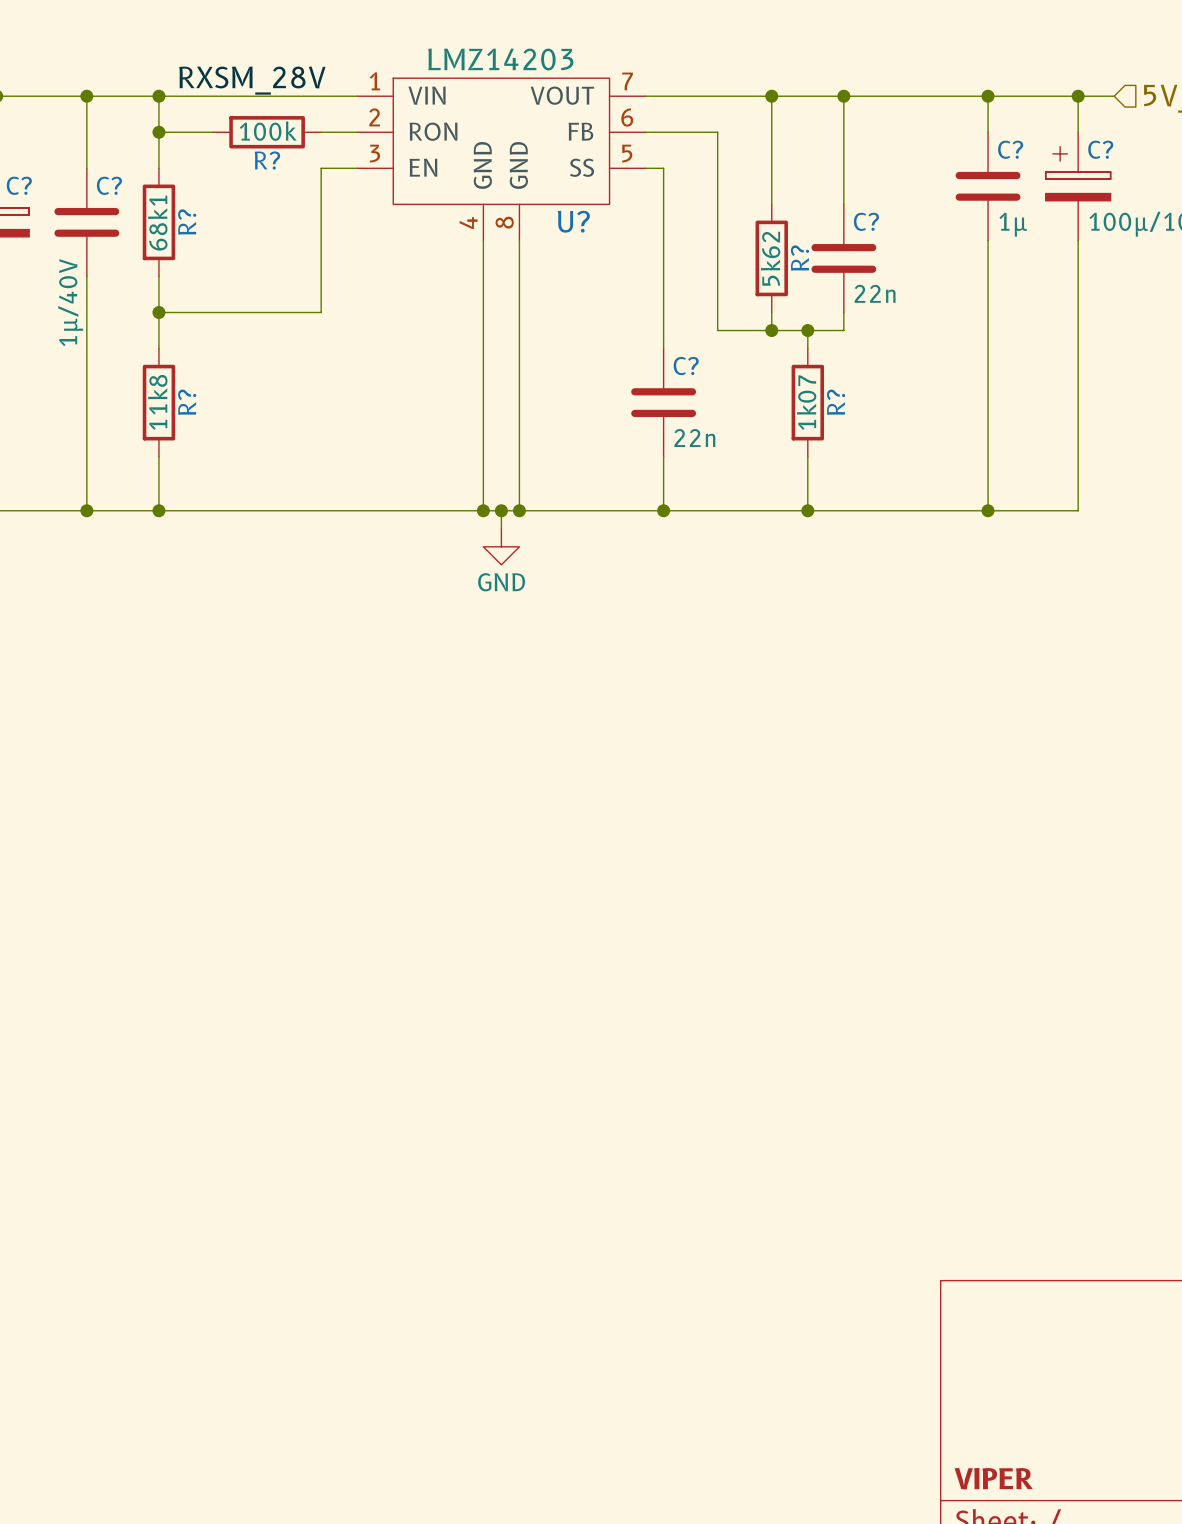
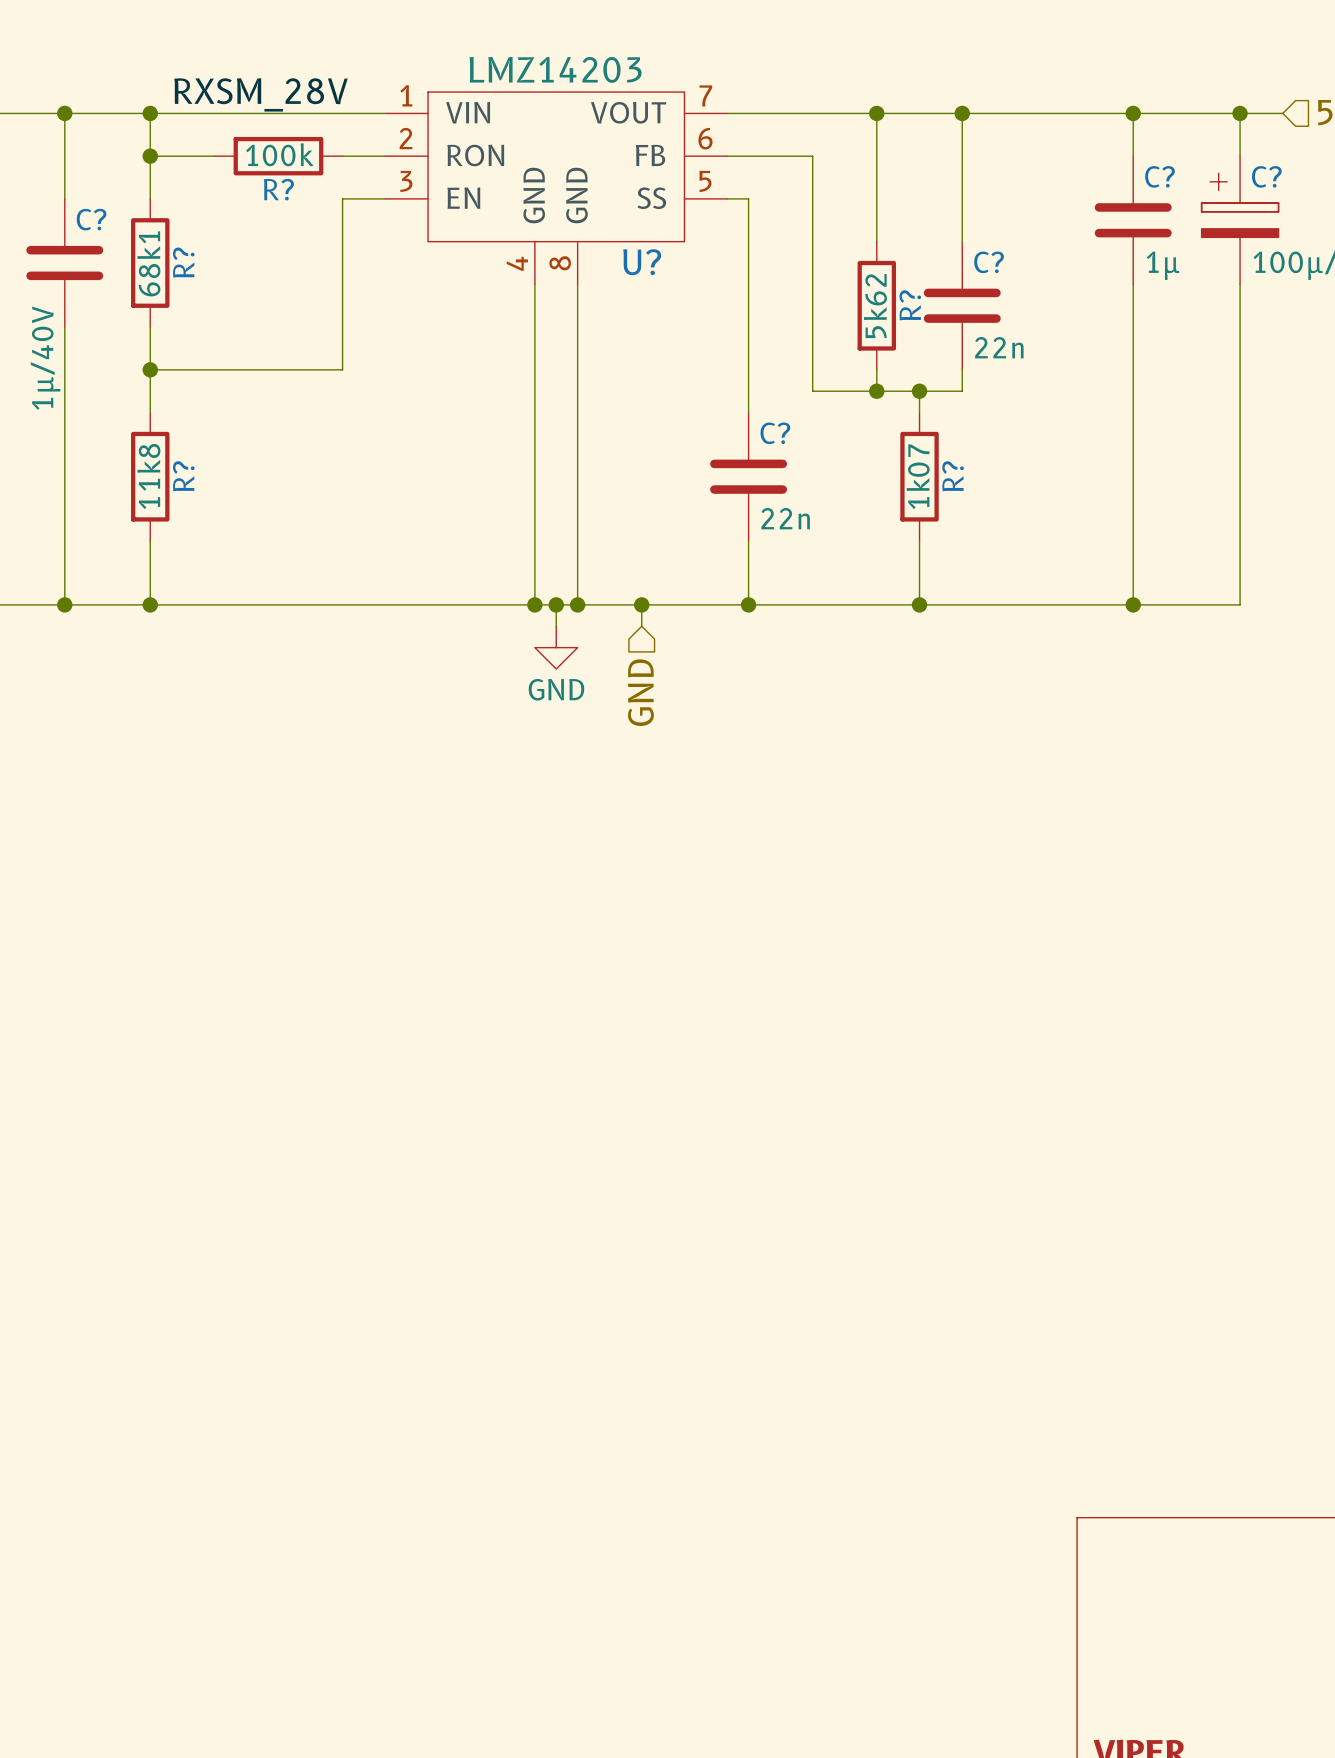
wire: none -> (641, 604) (641, 626)
junction: none -> (641, 604)
hierarchical label: none -> GND (640, 692)

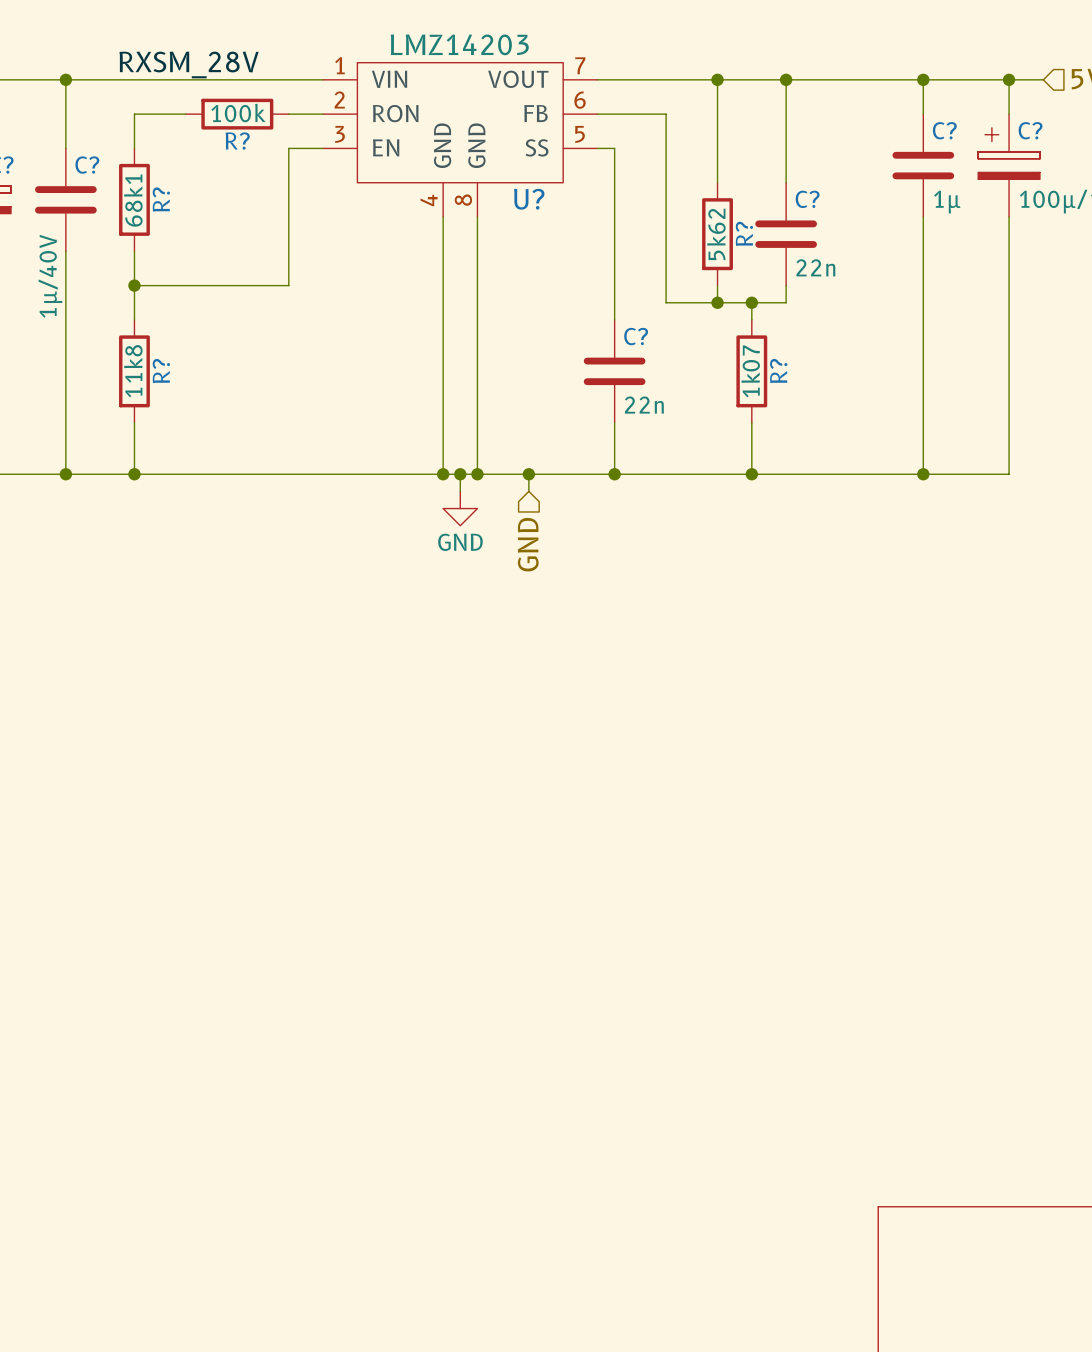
label position: RXSM_28V (260, 94) -> RXSM_28V (189, 64)
wire: (150, 113) (150, 156) -> none
junction: (150, 113) -> none
junction: (150, 156) -> none

